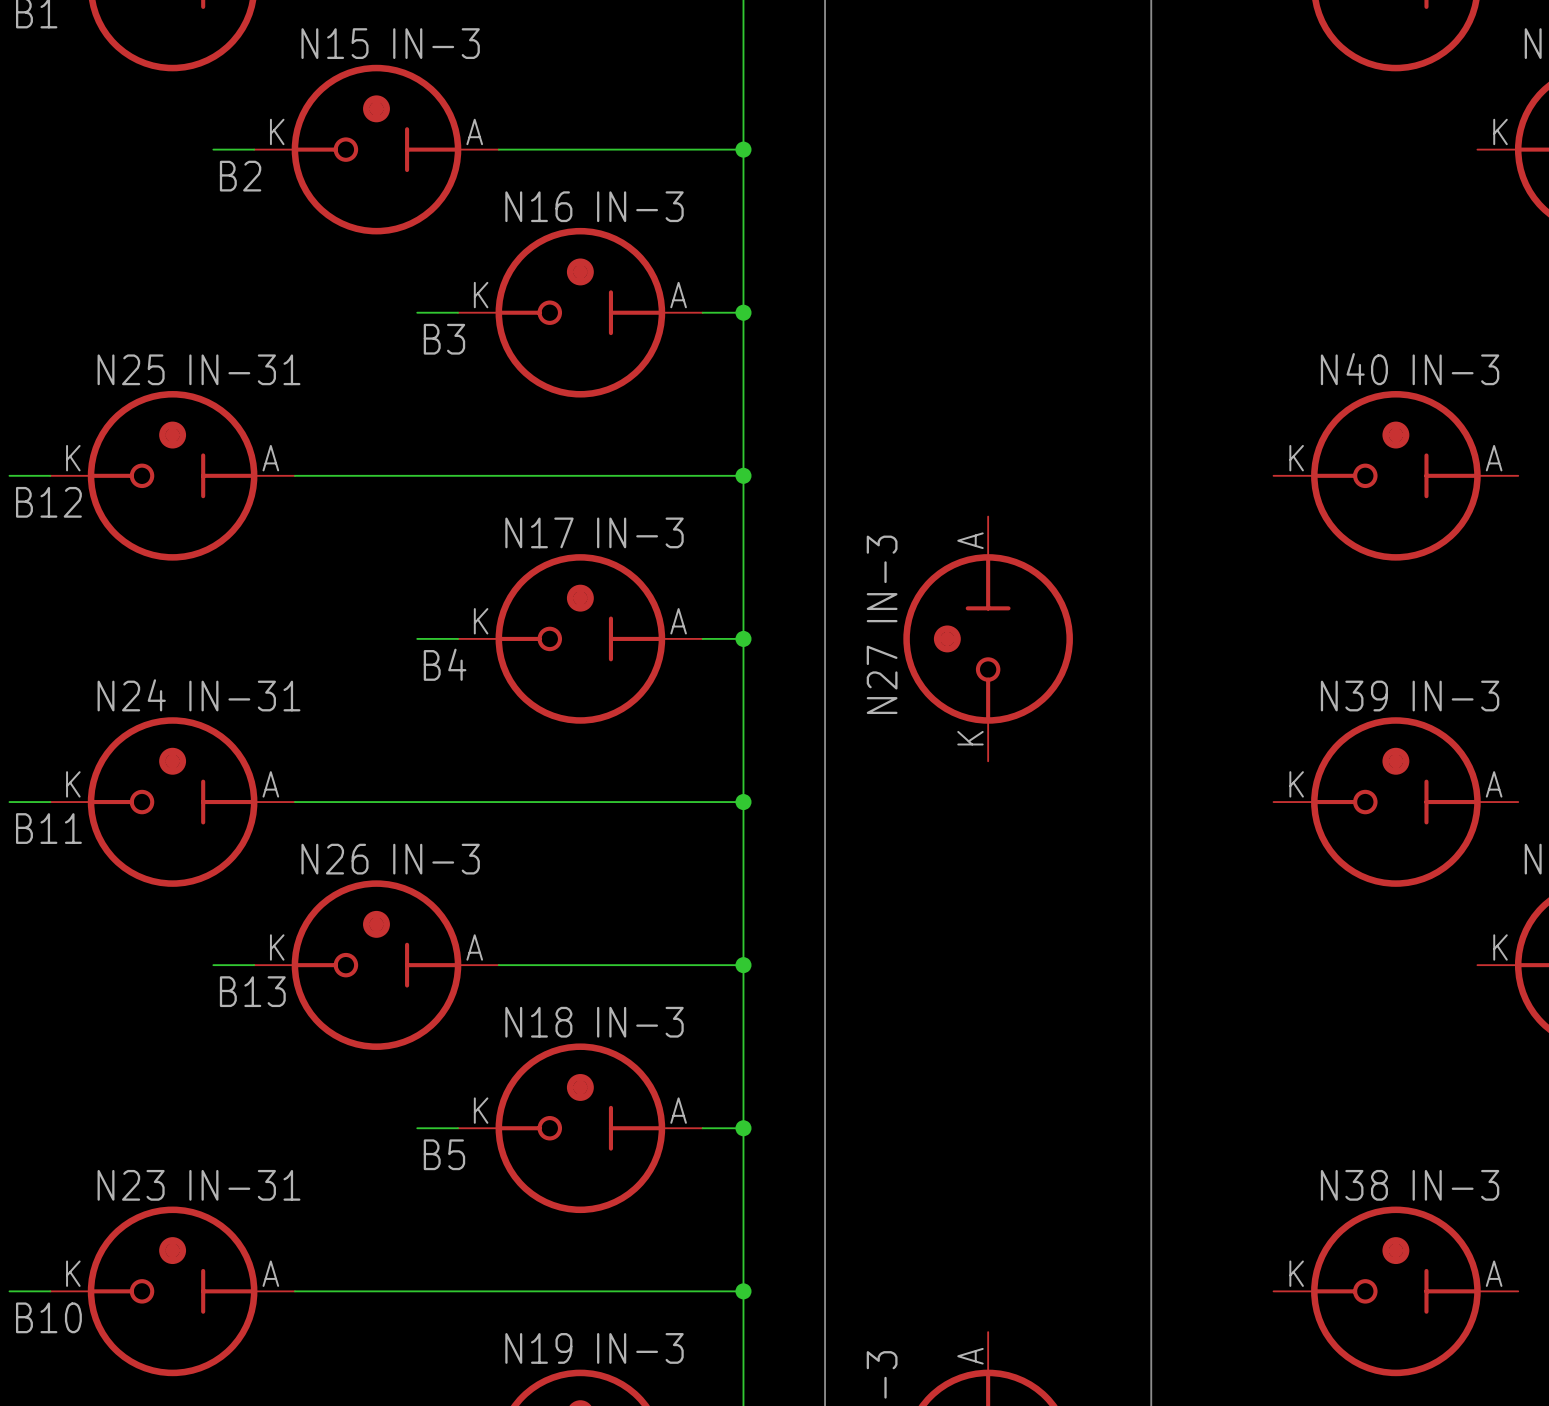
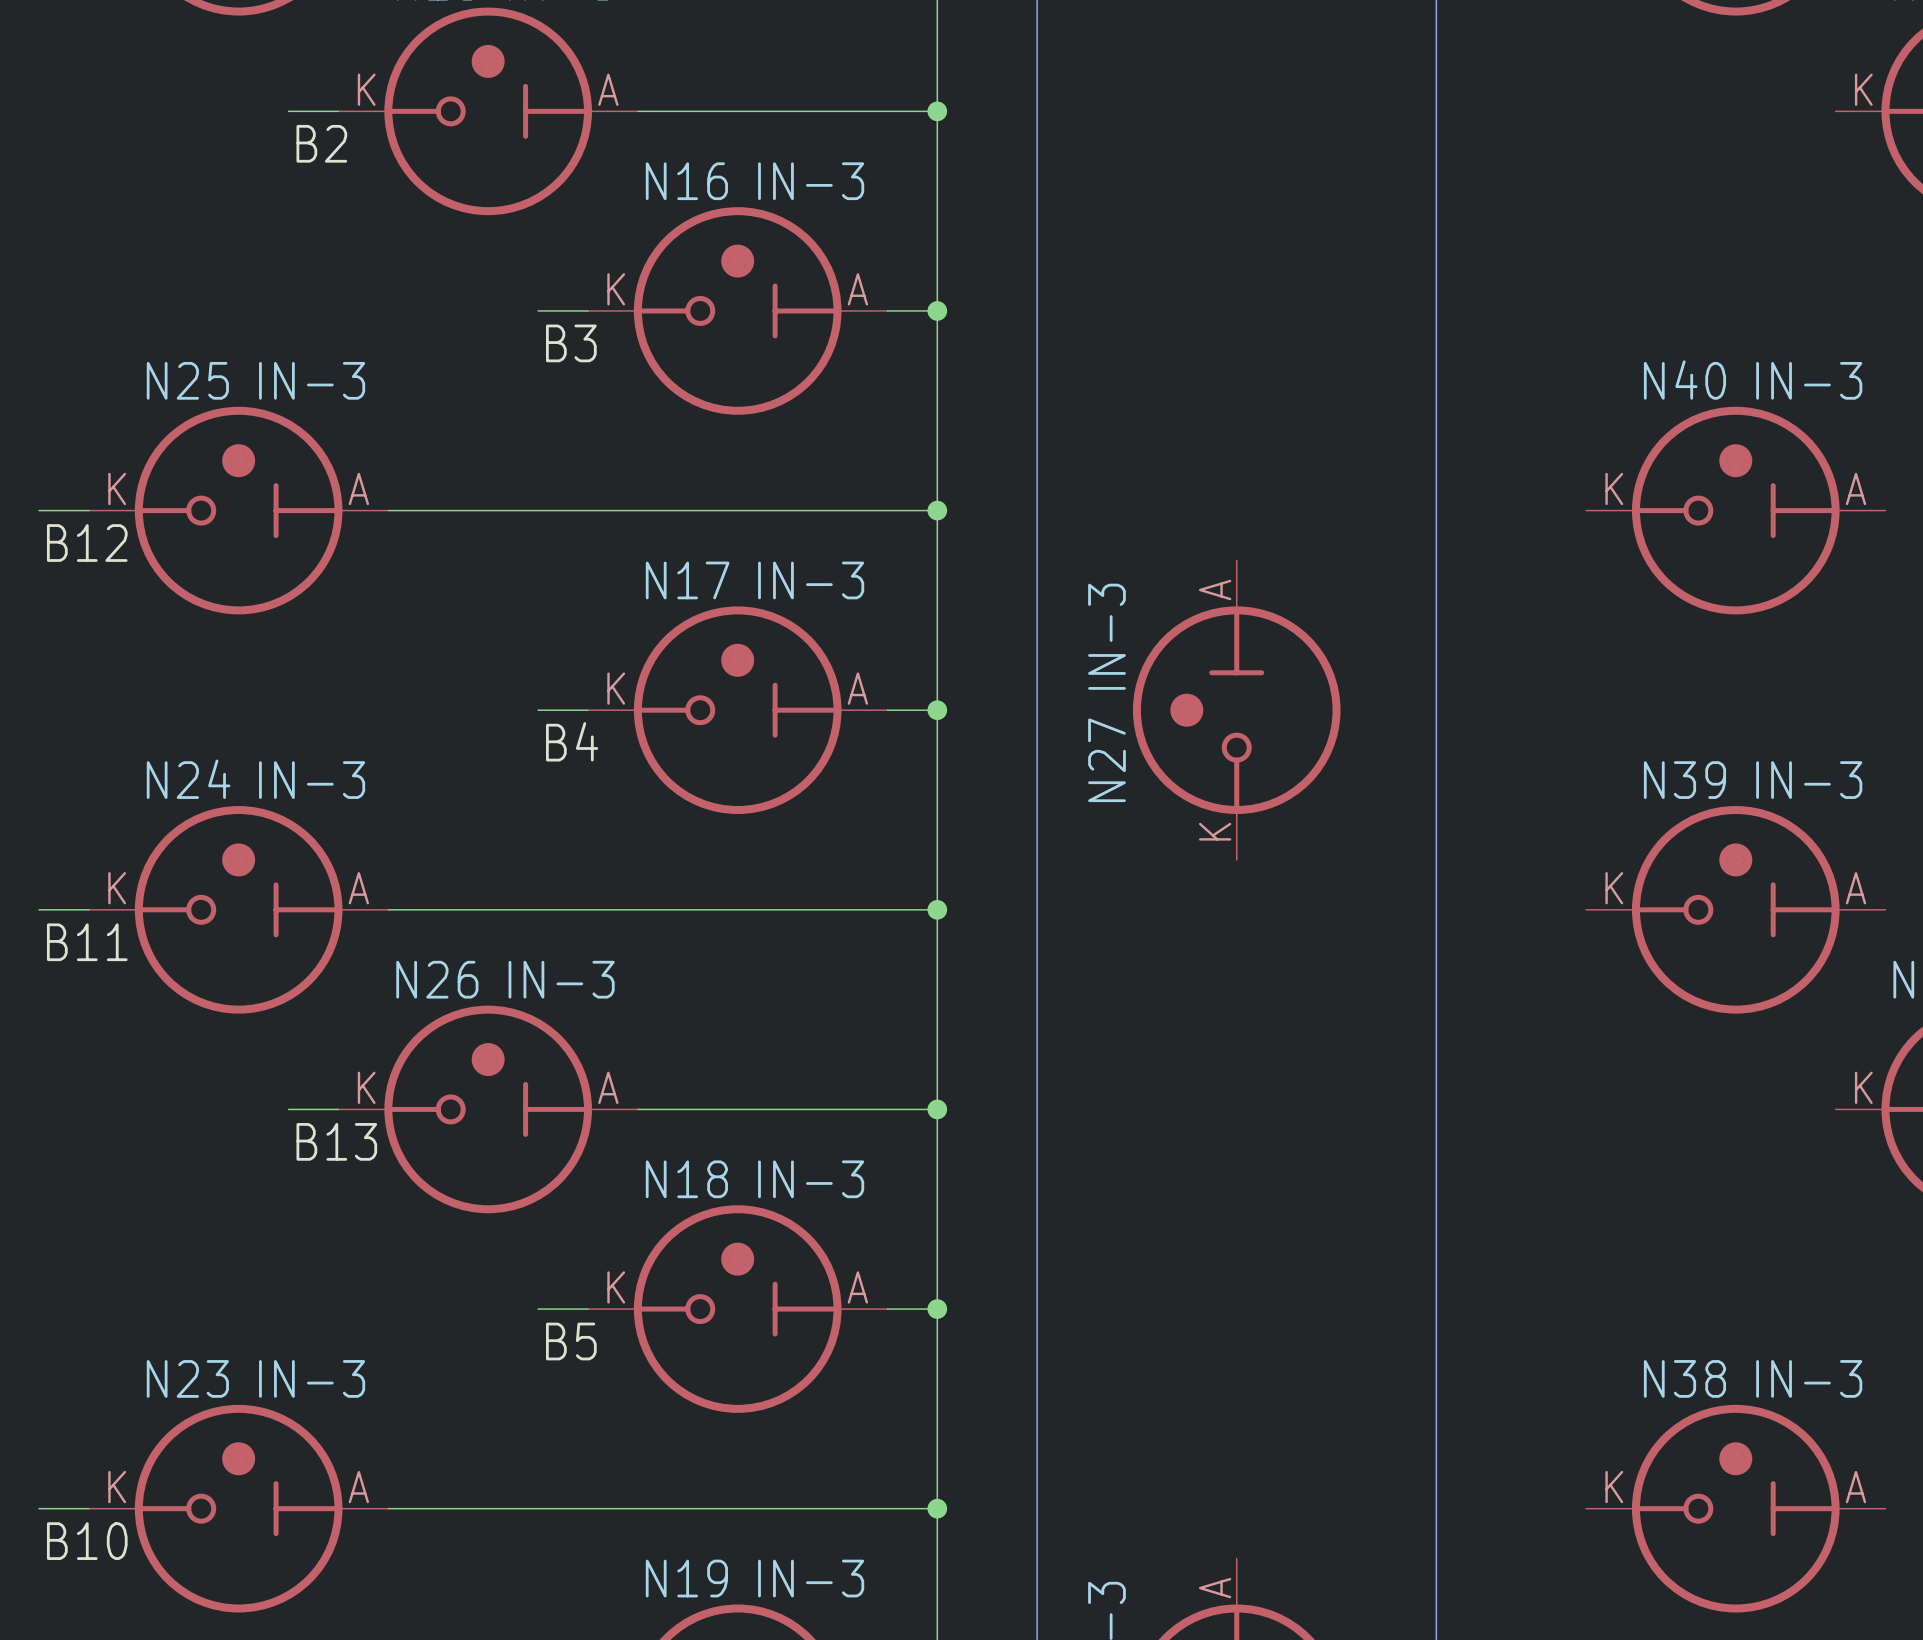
N25 value: IN-31 (244, 369) -> IN-3 (312, 380)
N24 value: IN-31 (244, 696) -> IN-3 (312, 780)
N23 value: IN-31 (244, 1185) -> IN-3 (312, 1378)

